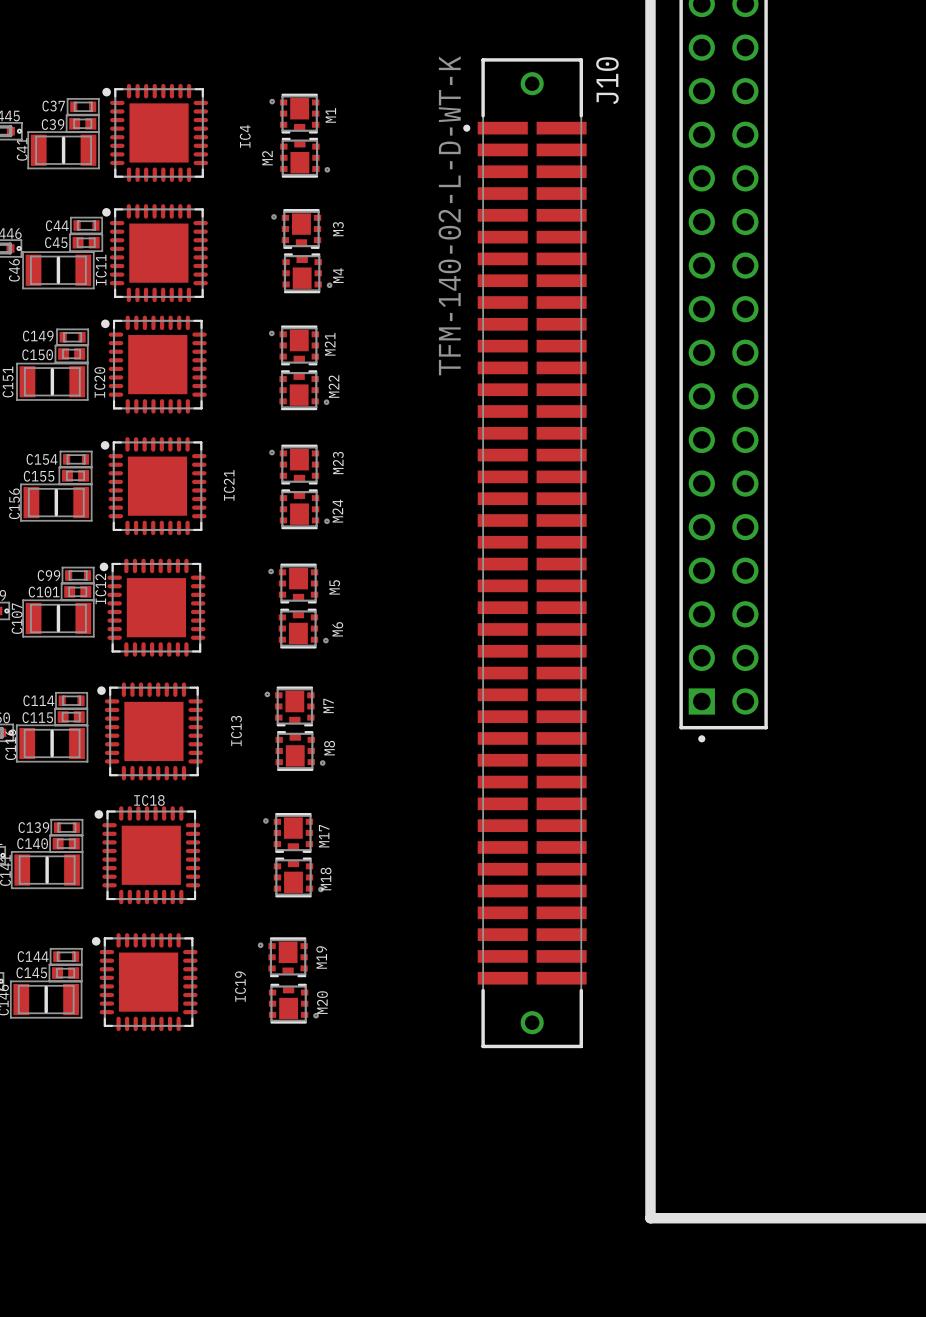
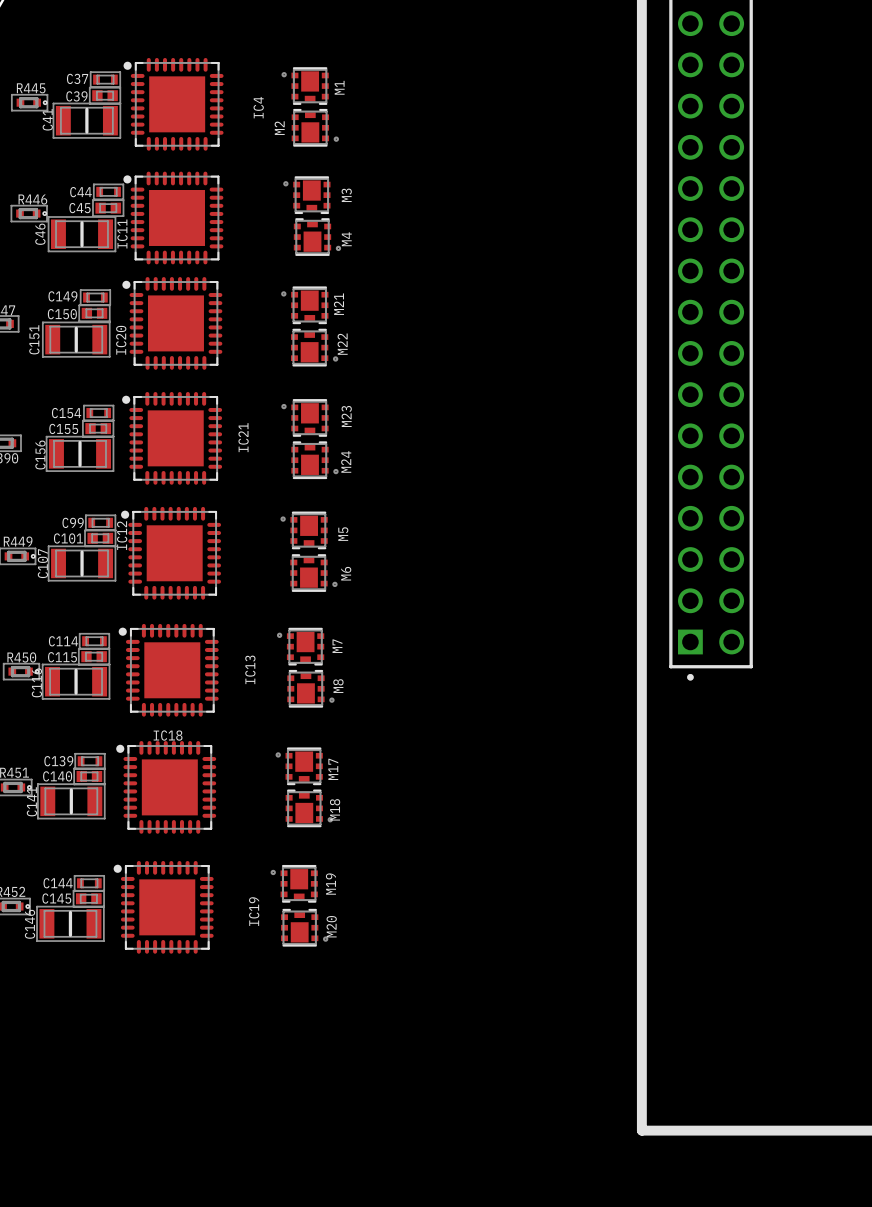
J10: TFM-140-02-L-D-WT-K (525, 553) -> none

